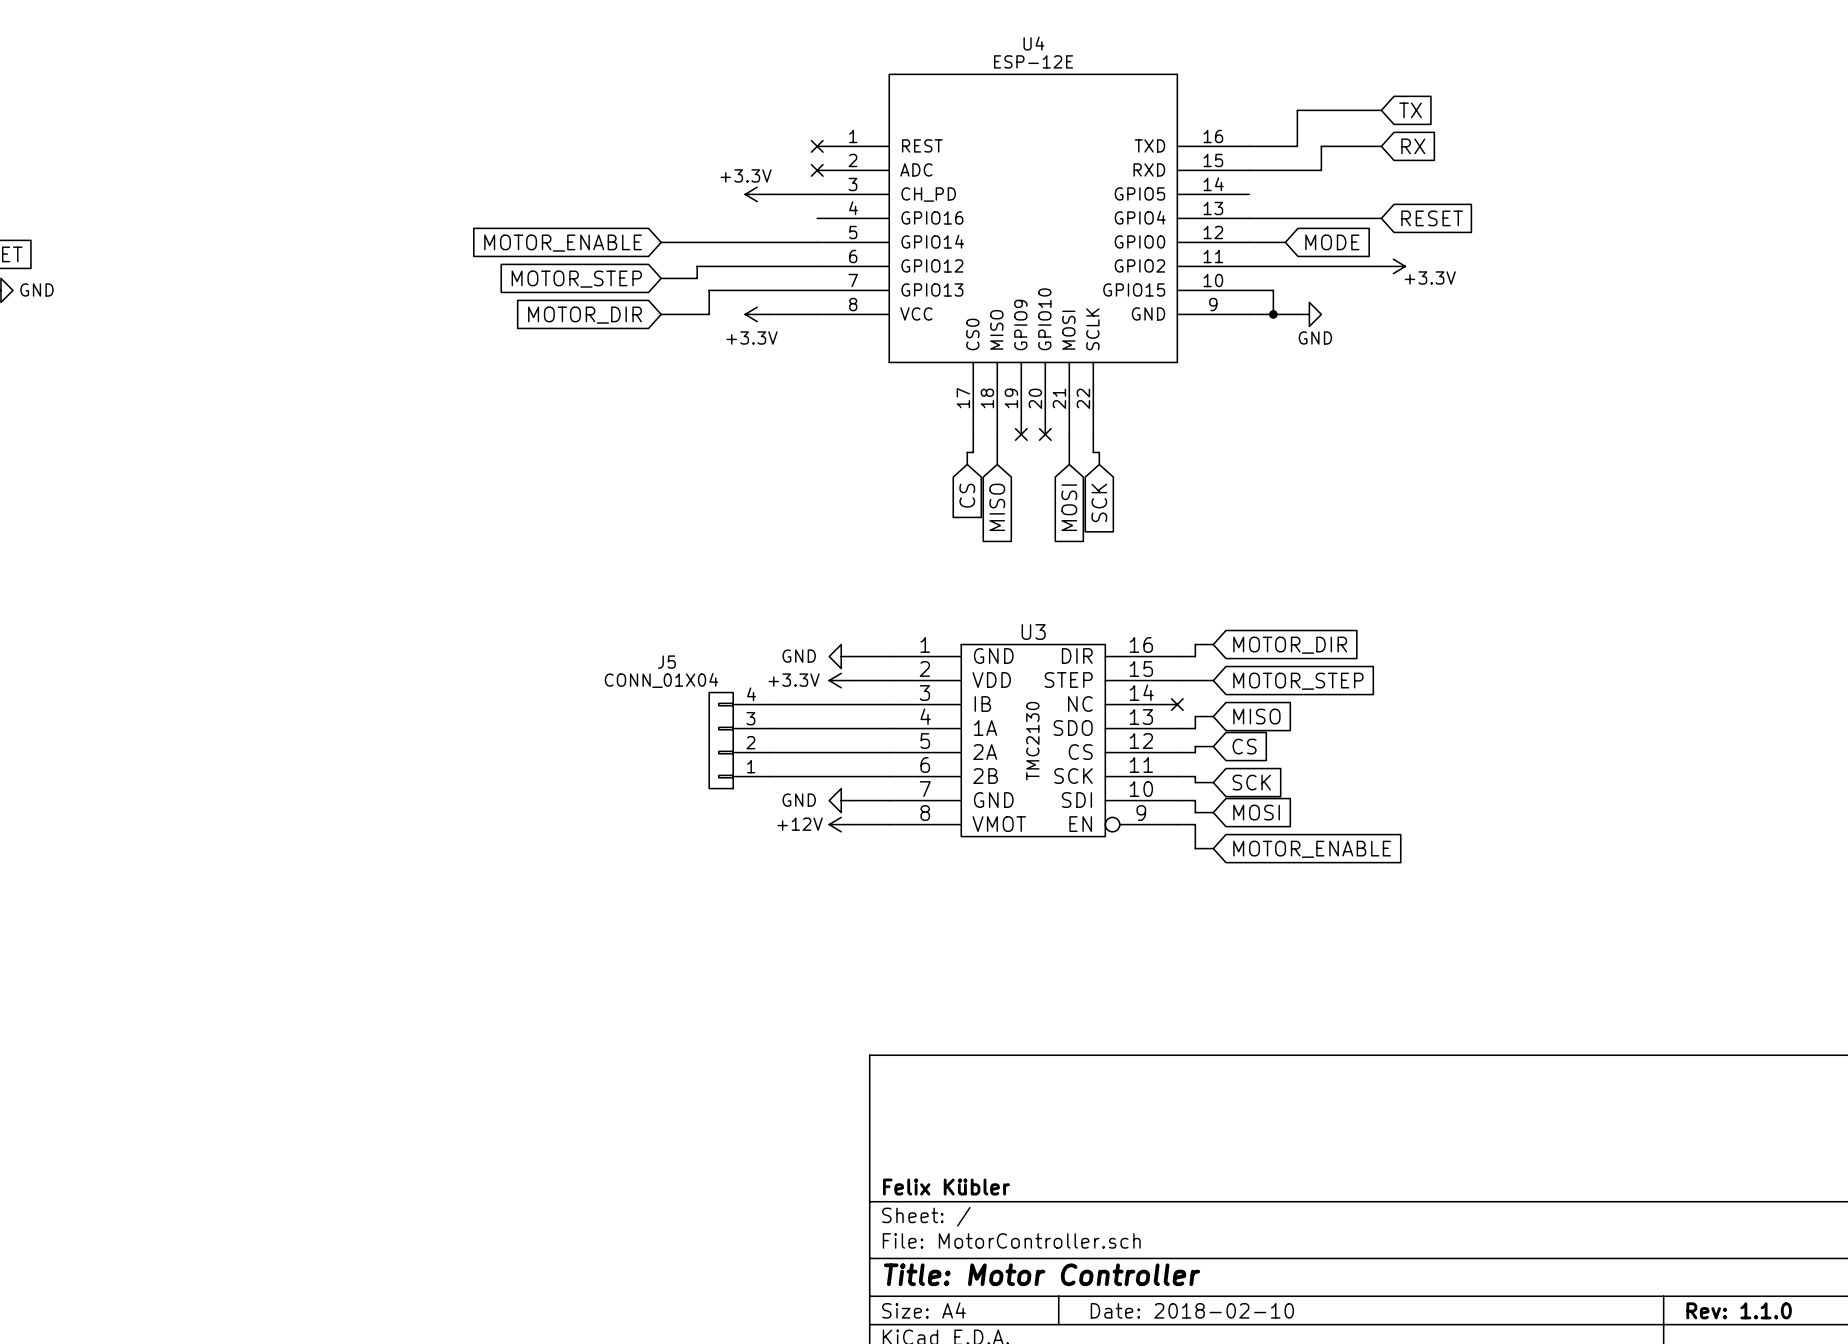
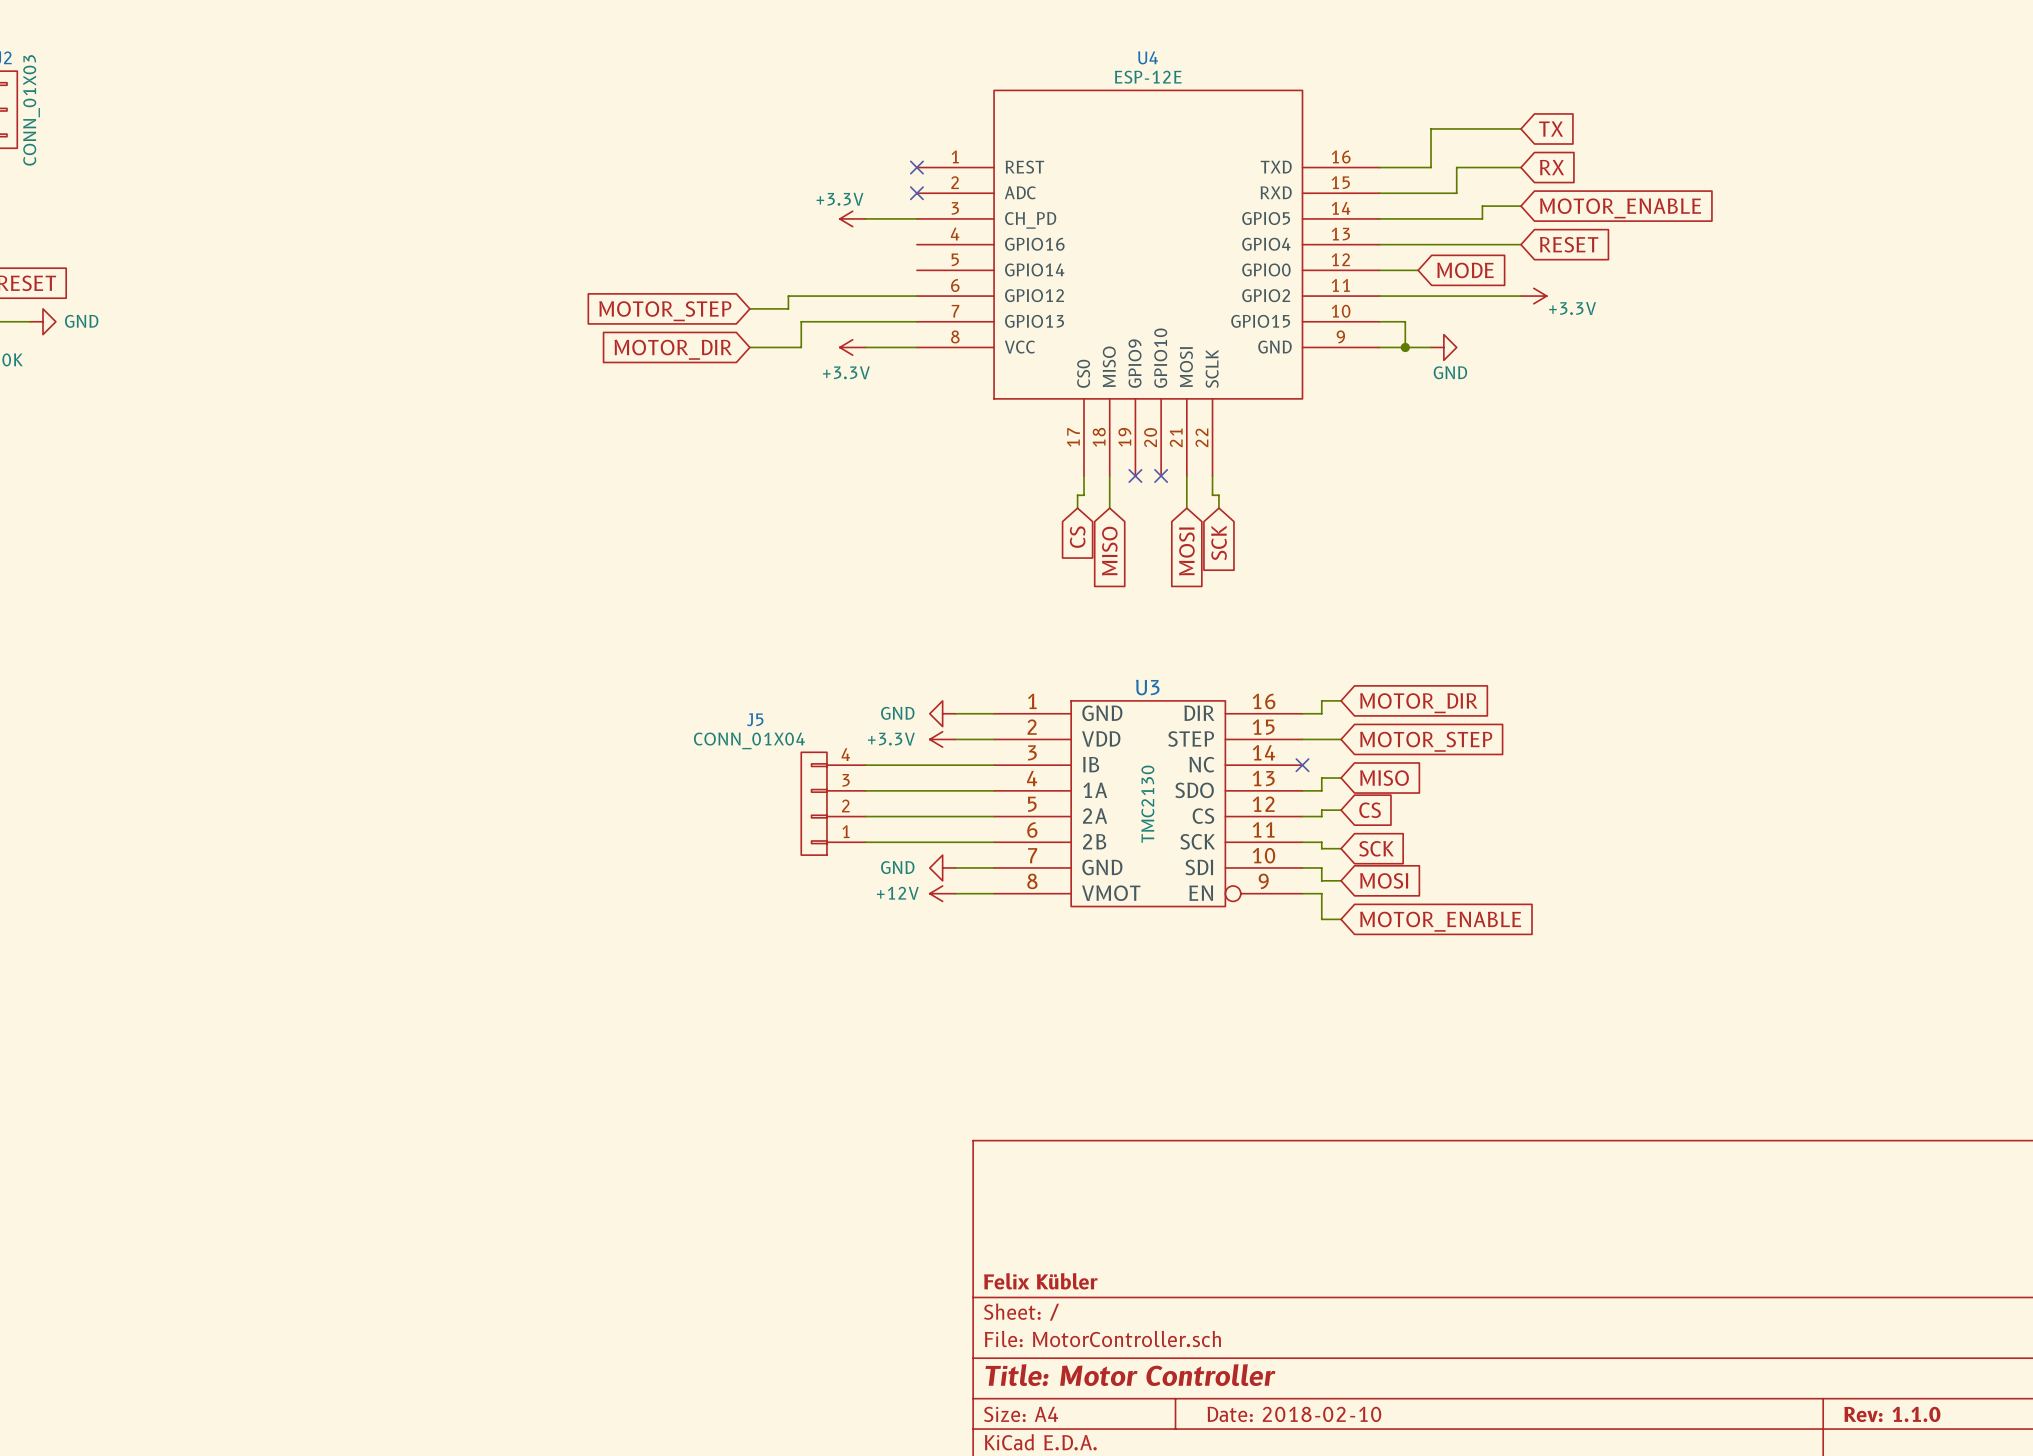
wire: none -> (1520, 206) (1482, 206) (1482, 218) (1379, 218)
global label: none -> MOTOR_ENABLE (1620, 208)
wire: (661, 242) (817, 242) -> none
global label: MOTOR_ENABLE (563, 243) -> none

